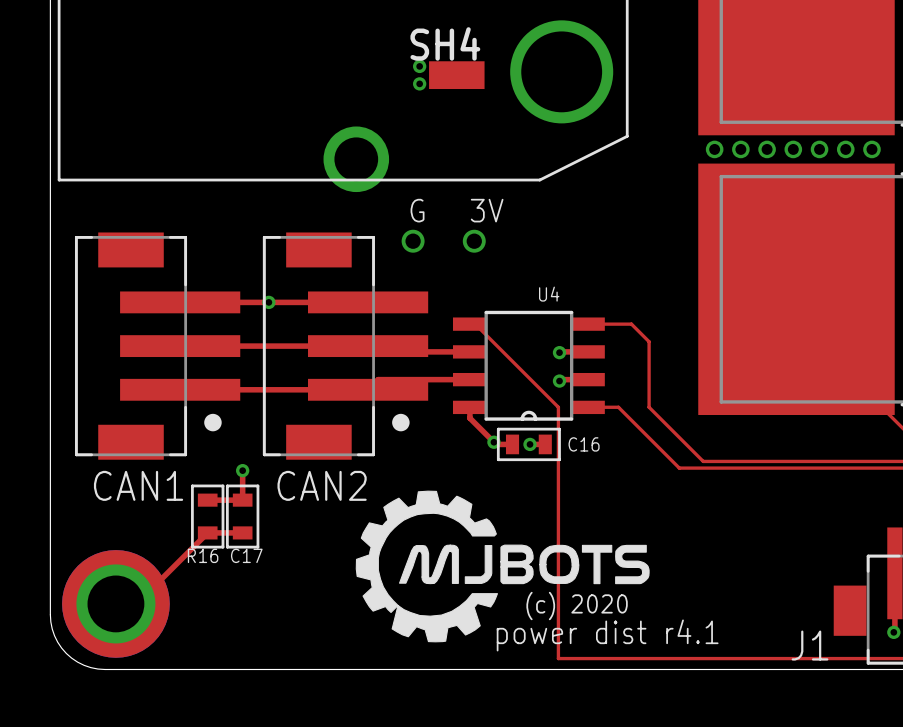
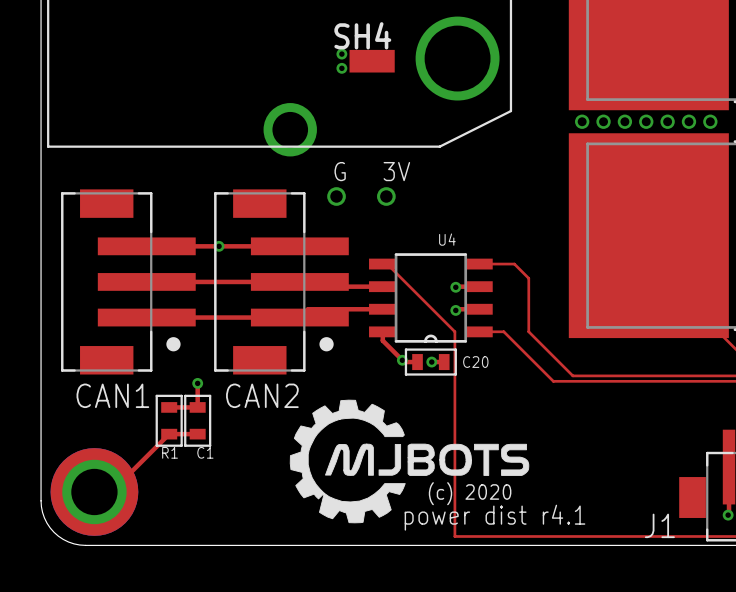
C16 name: C16 (584, 444) -> C20 (475, 362)
R16 name: R16 (203, 555) -> R1 (170, 452)
C17 name: C17 (246, 555) -> C1 (205, 452)

